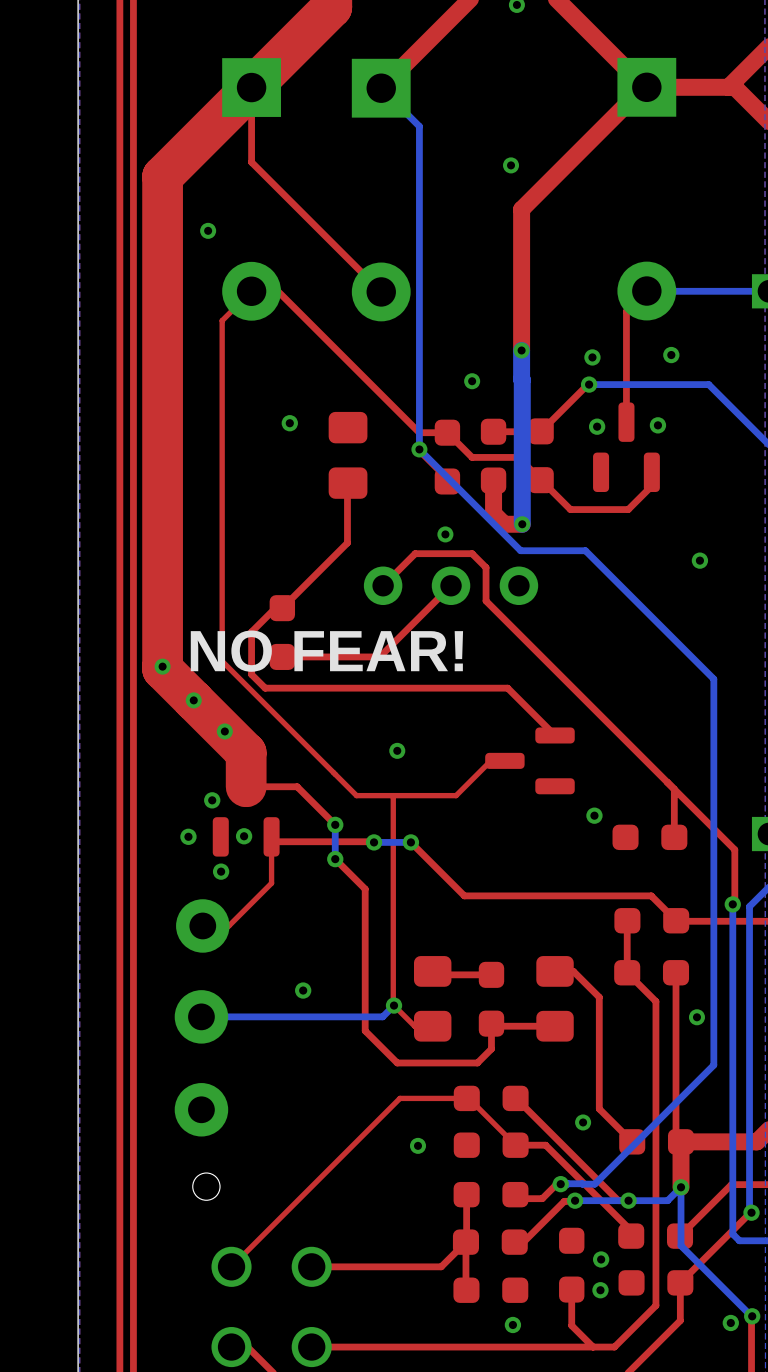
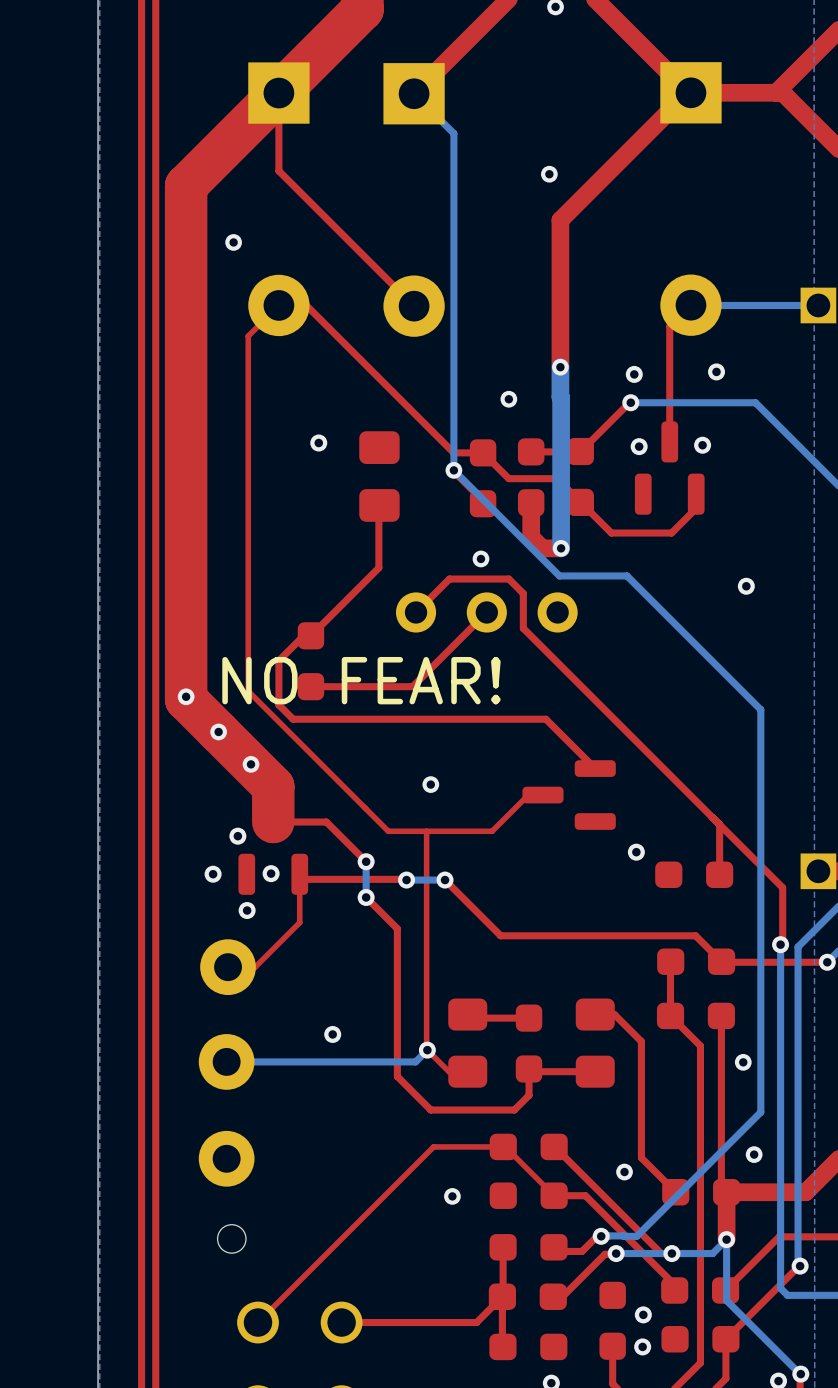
via: none -> (754, 1154)

